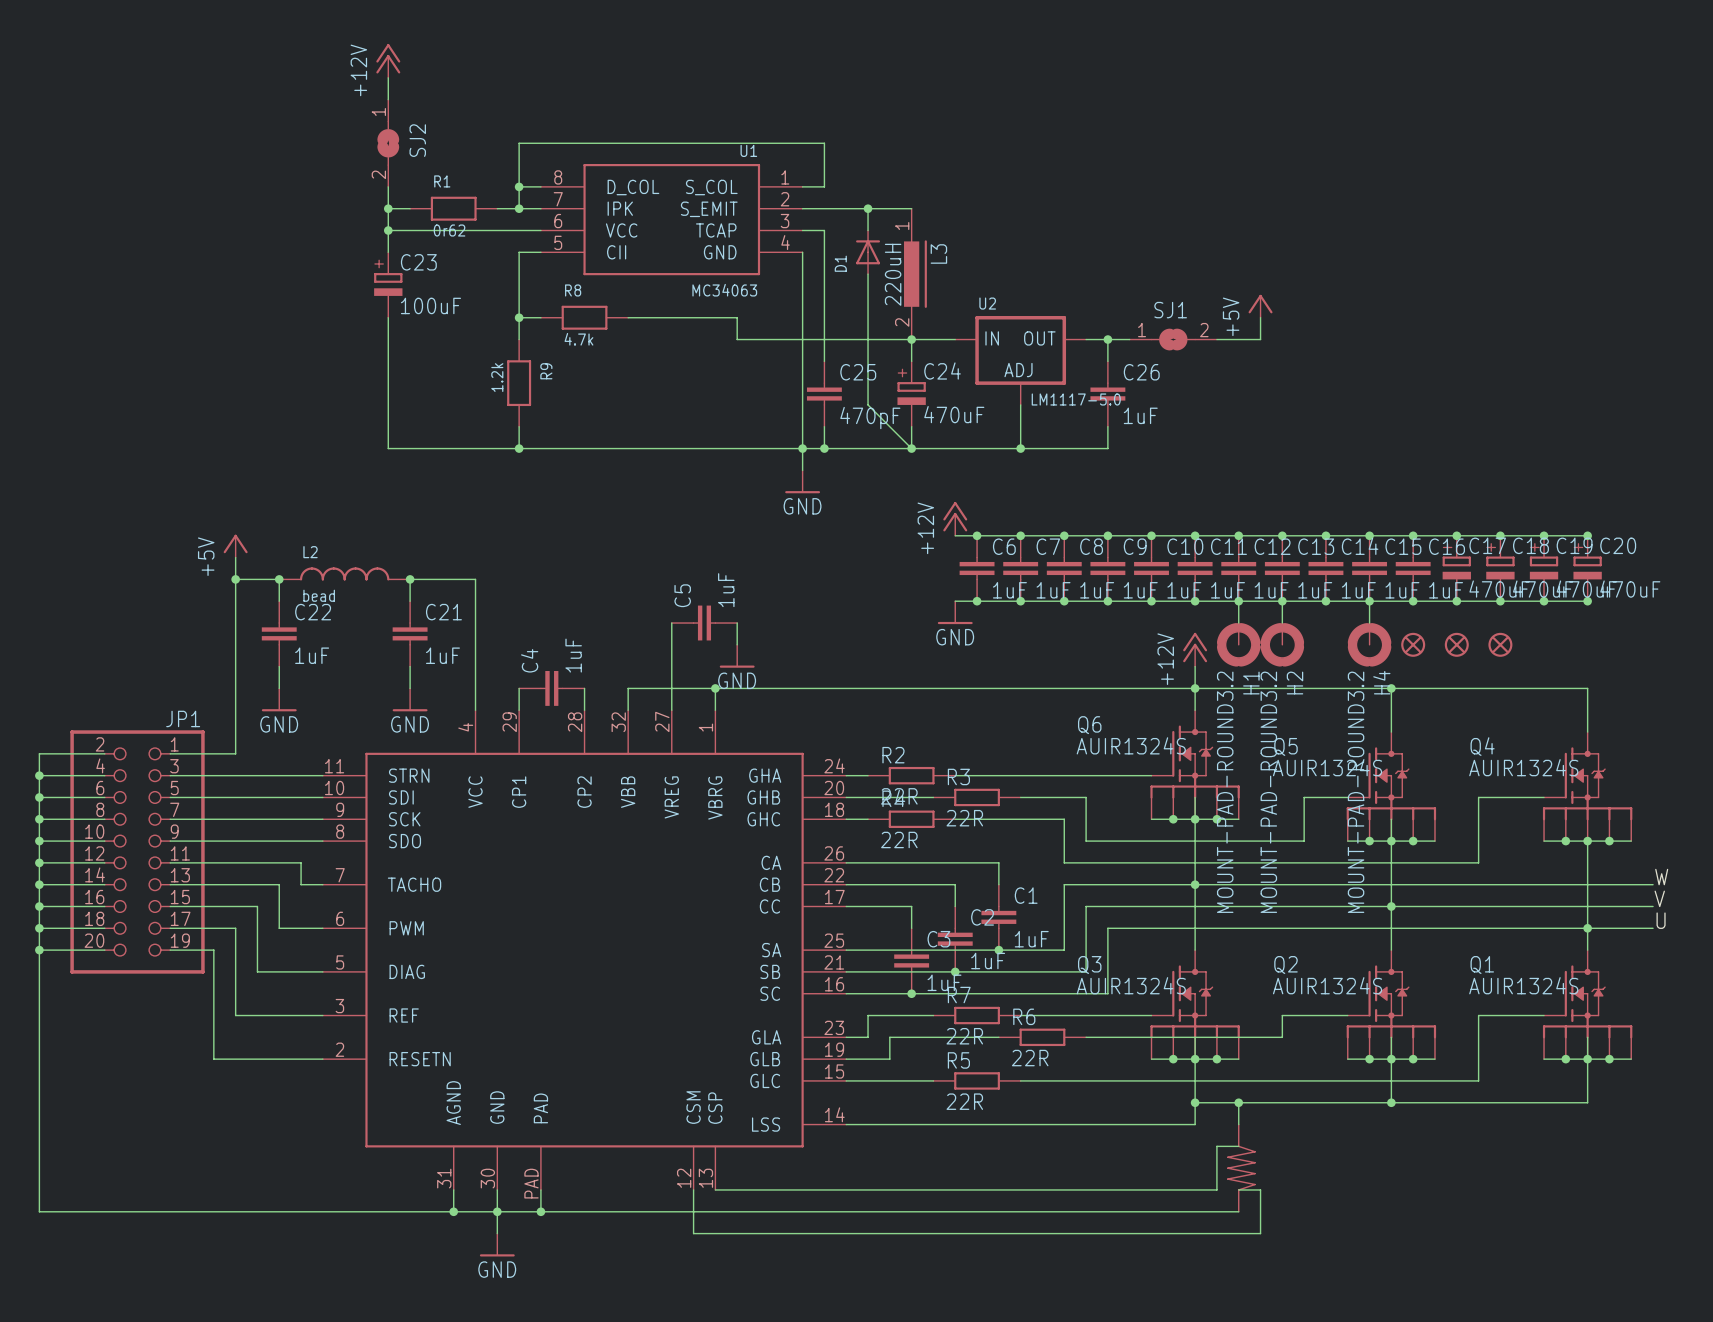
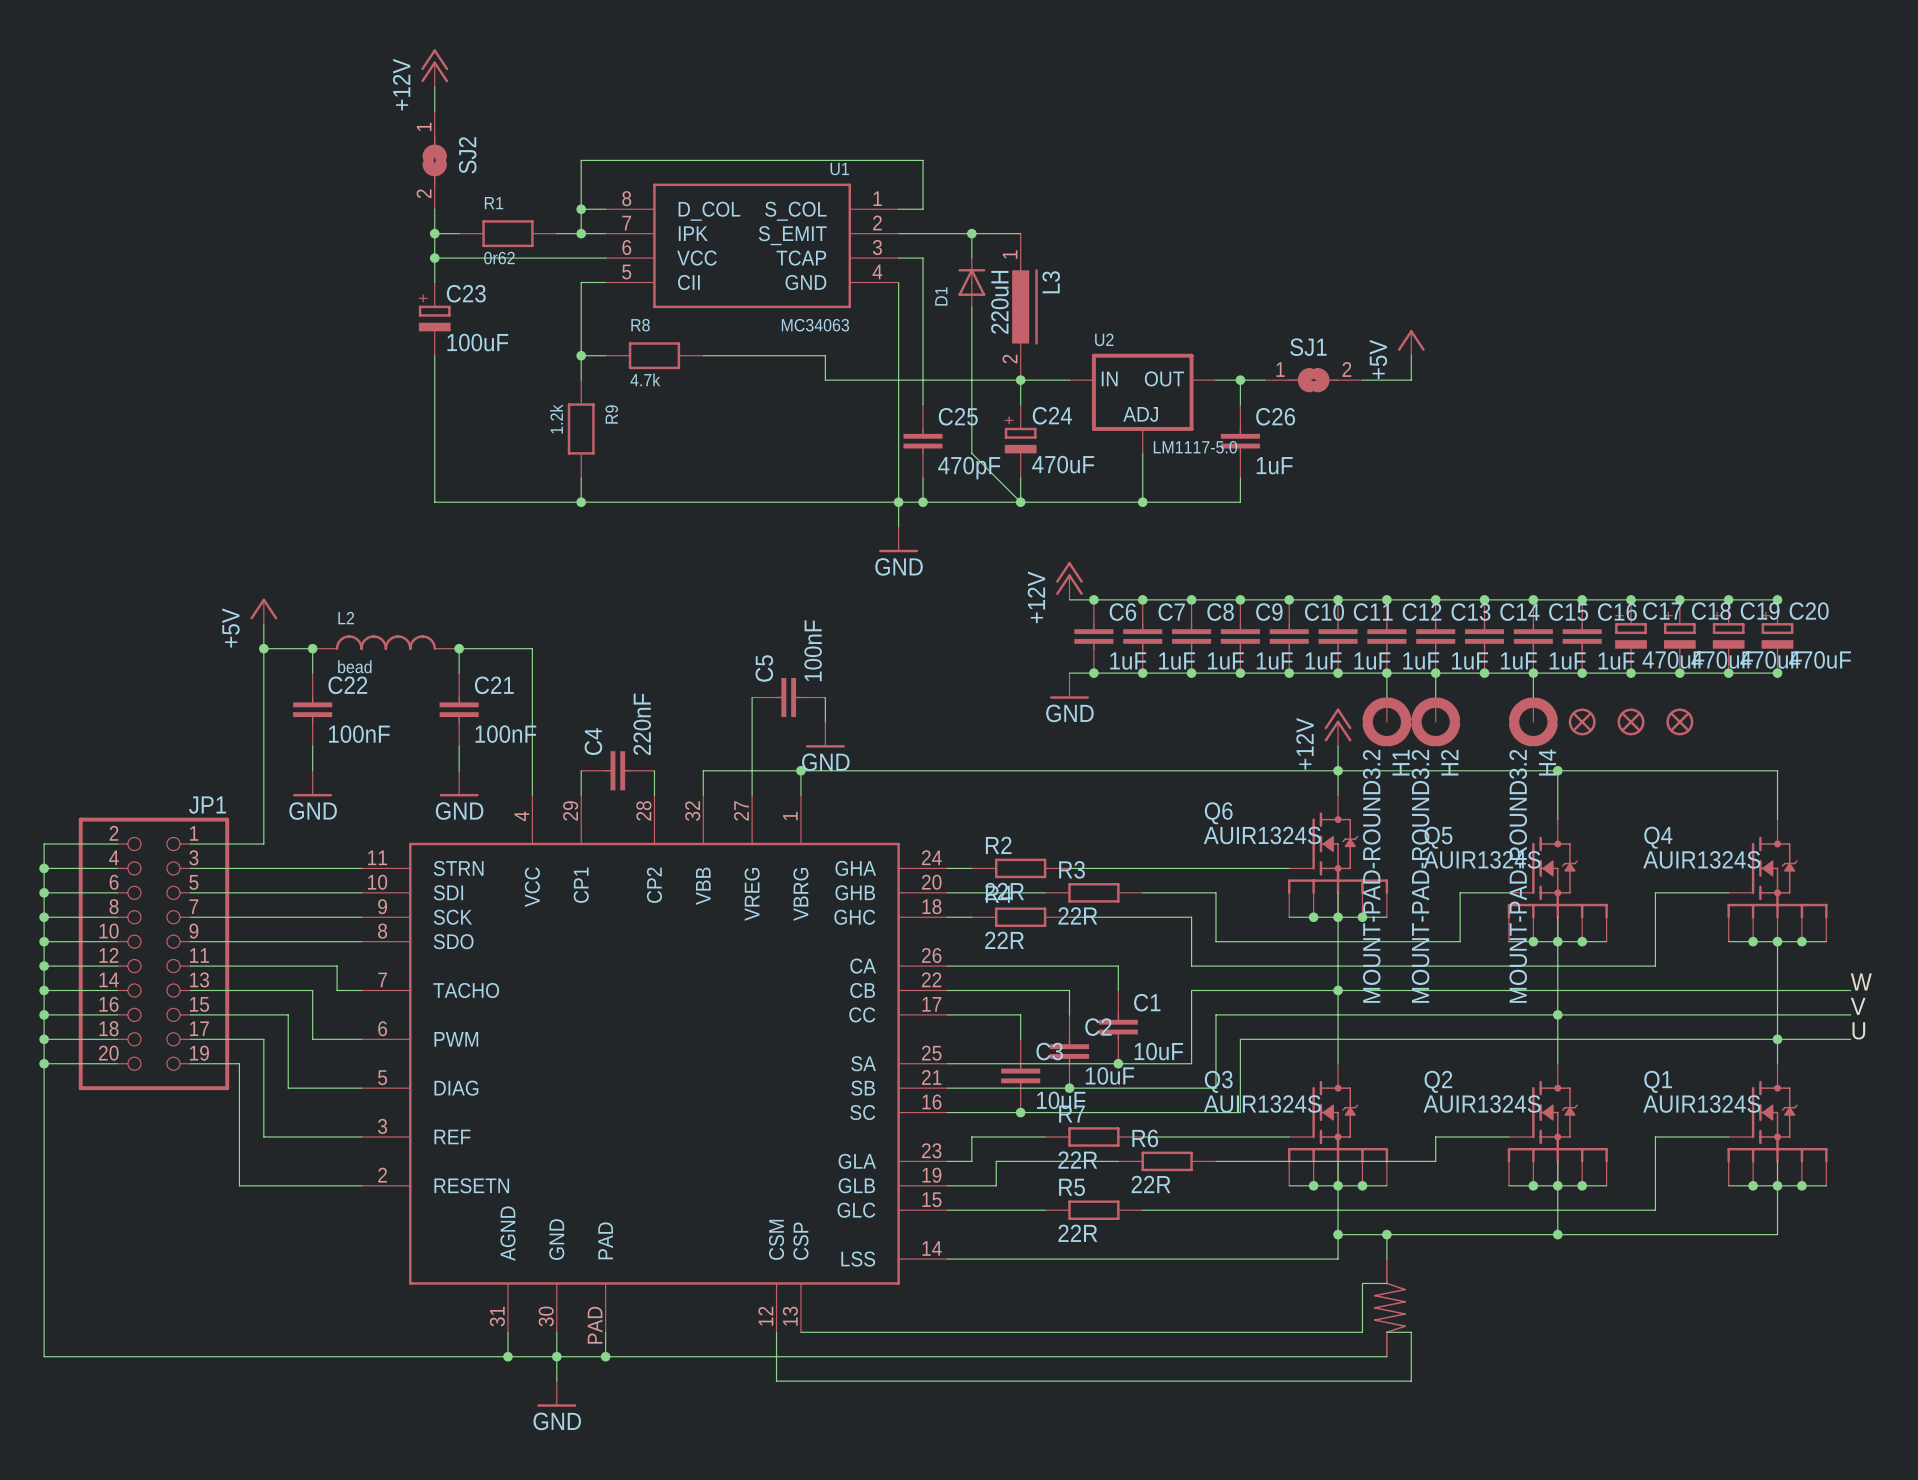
C5 value: 1uF (726, 590) -> 100nF (813, 650)
C22 value: 1uF (312, 655) -> 100nF (359, 734)
C21 value: 1uF (442, 655) -> 100nF (505, 734)
C4 value: 1uF (573, 655) -> 220nF (642, 724)
C1 value: 1uF (1031, 939) -> 10uF (1158, 1051)
C2 value: 1uF (988, 961) -> 10uF (1110, 1075)
C3 value: 1uF (944, 982) -> 10uF (1061, 1100)

